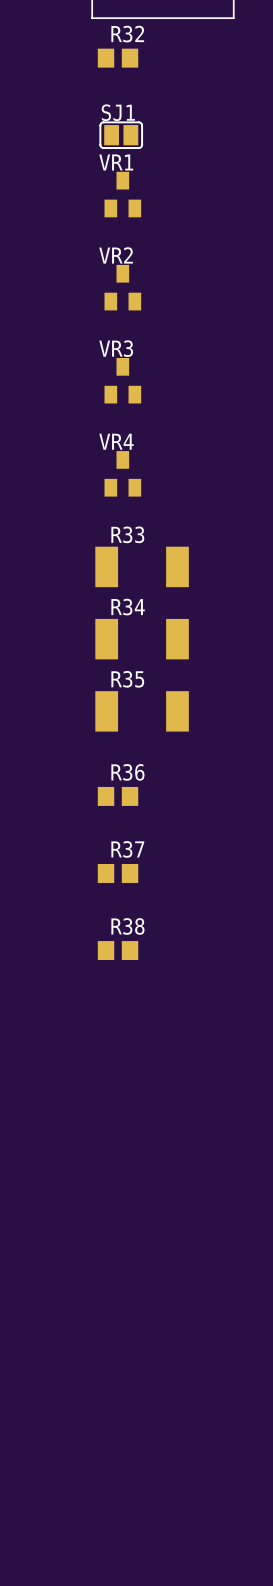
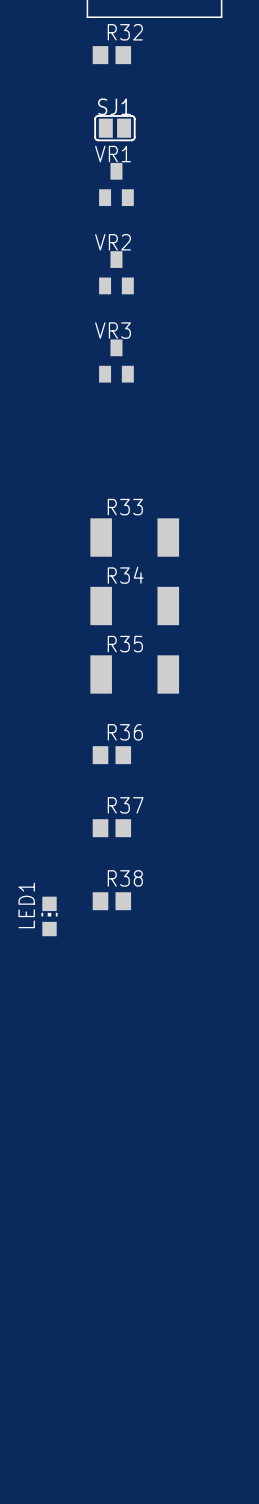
VR4: (122, 473) -> none
LED1: none -> (49, 916)

